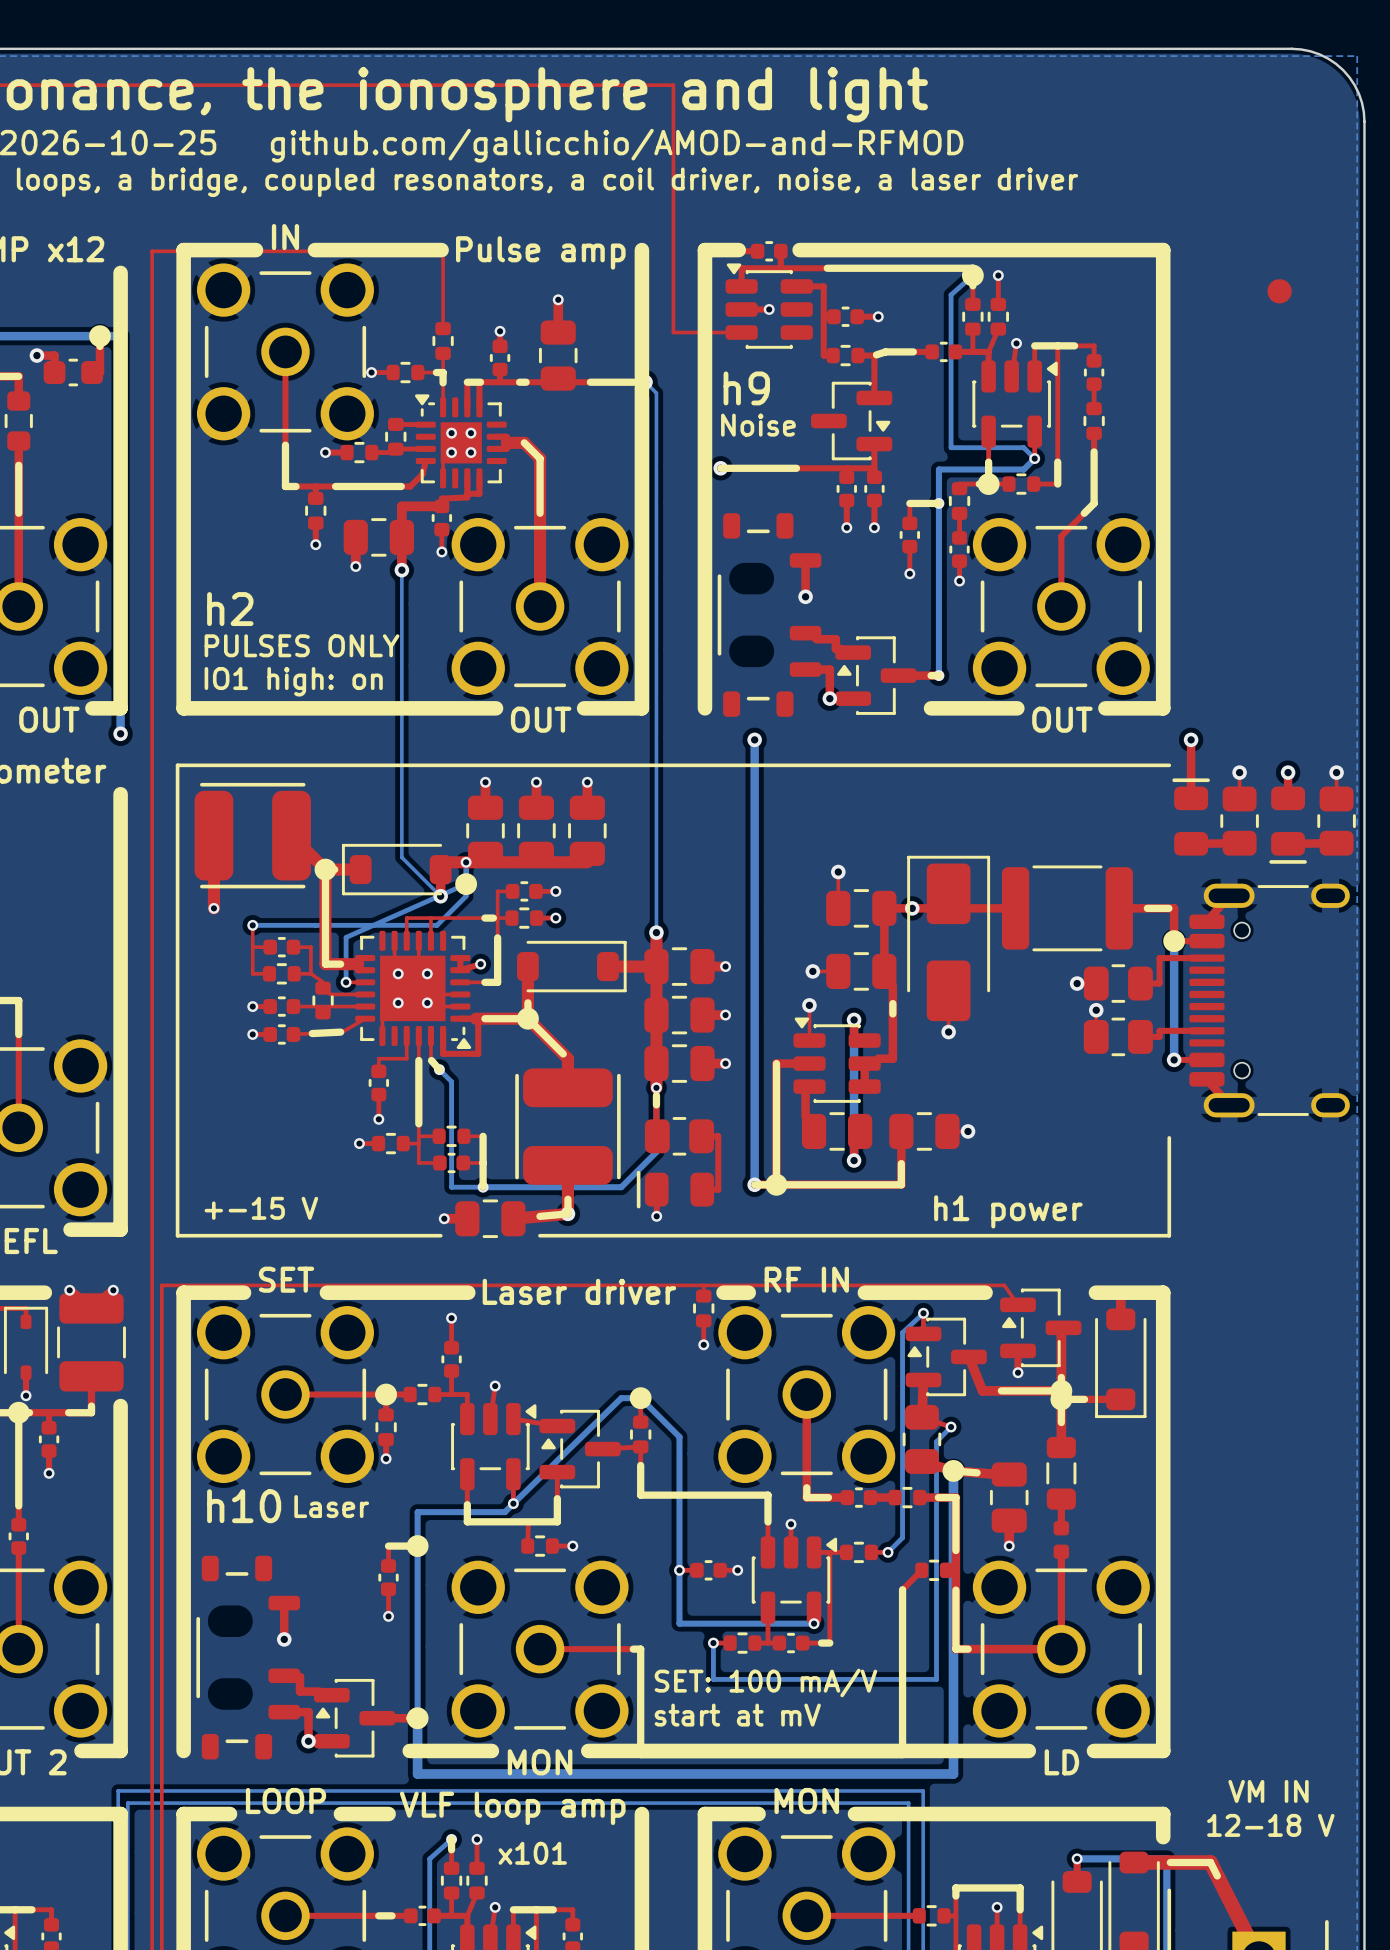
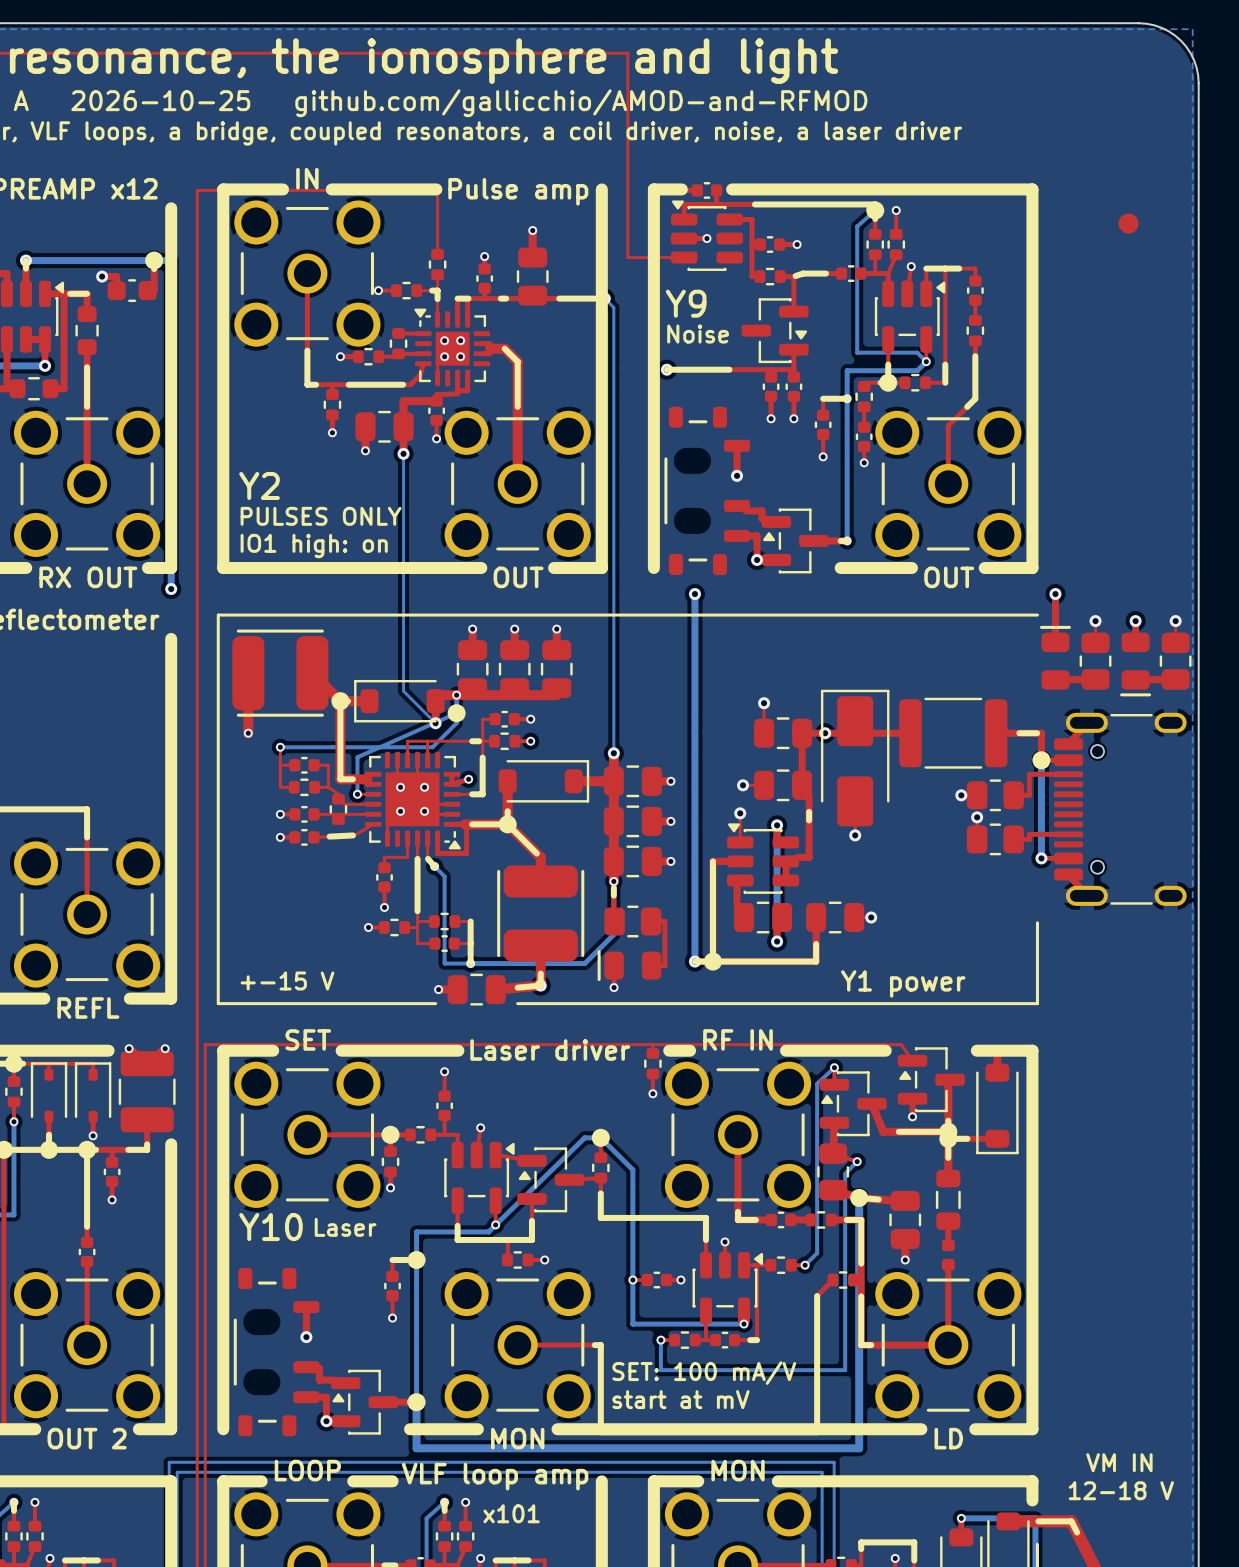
text: h9 (746, 388) -> Y9 (686, 303)
text: h2 (230, 609) -> Y2 (259, 485)
text: h1 power (1008, 1211) -> Y1 power (903, 983)
text: h10 (244, 1506) -> Y10 (270, 1227)

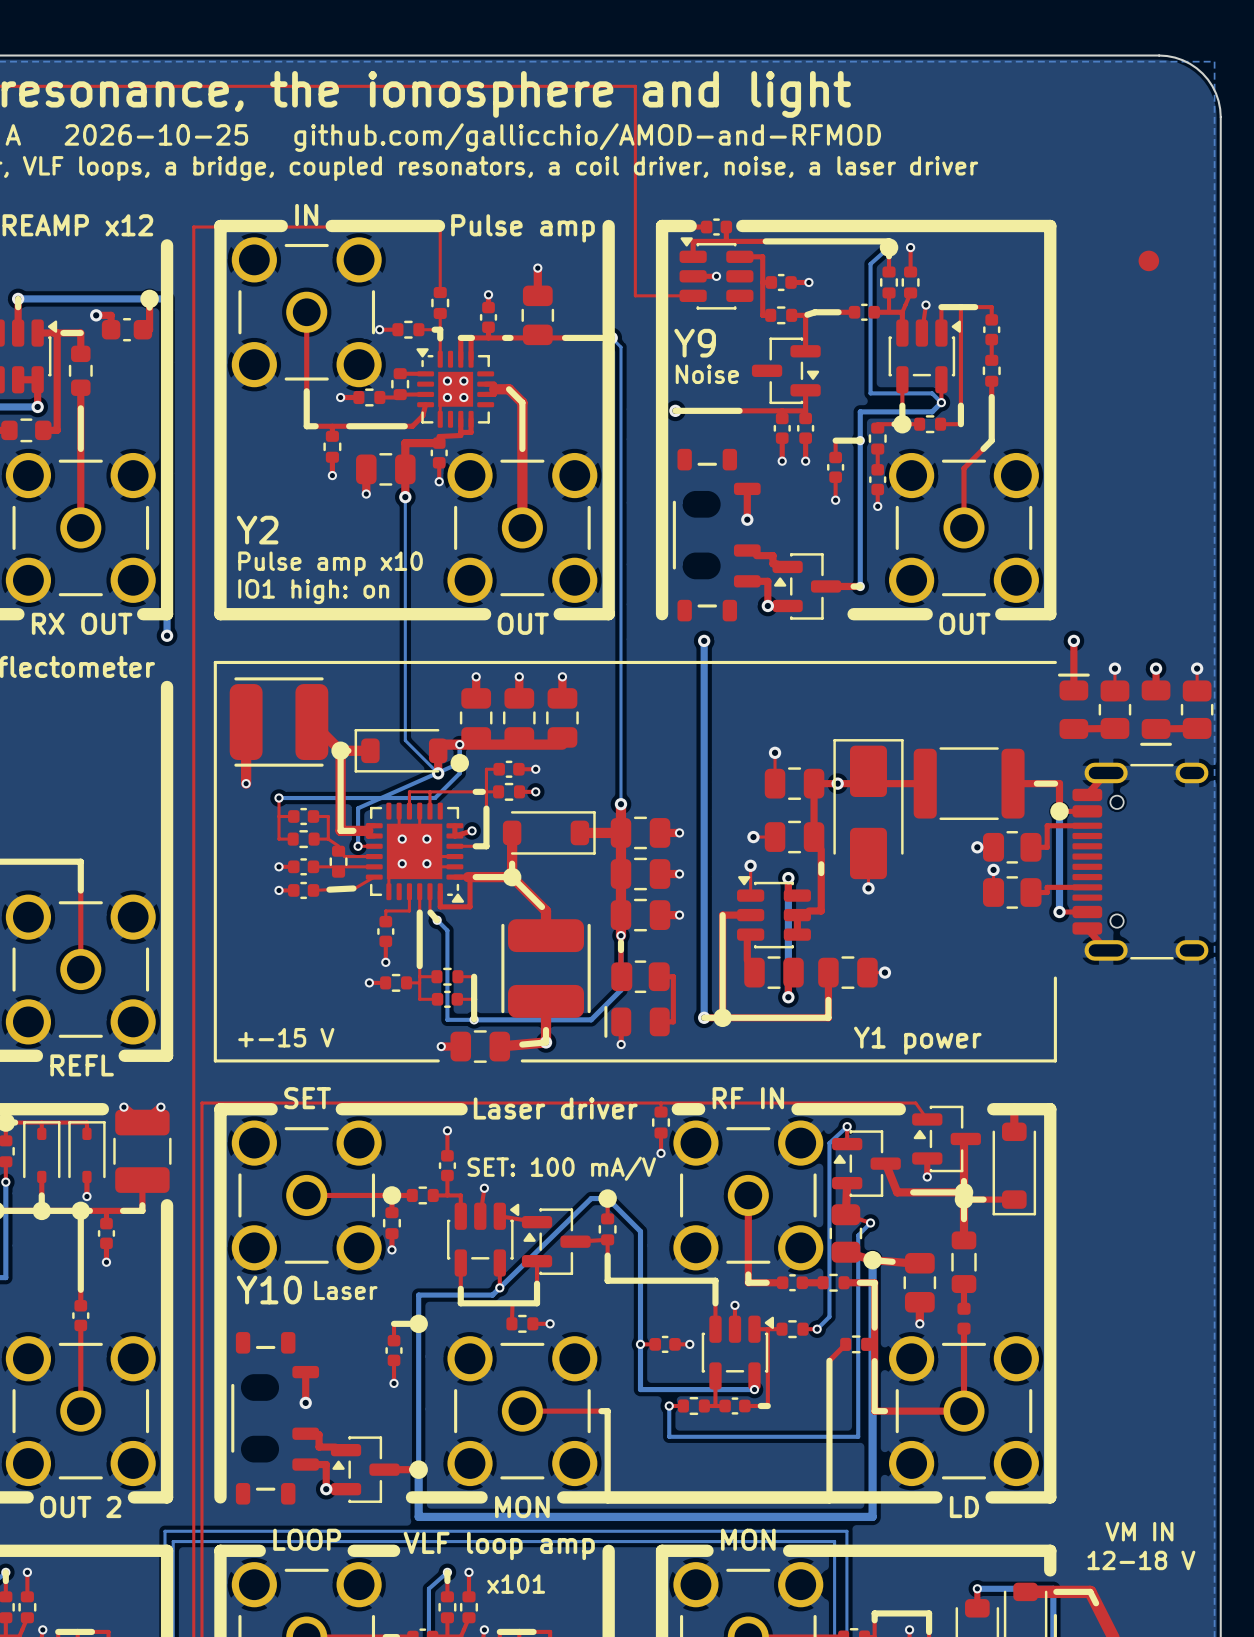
text: PULSES ONLY (321, 516) -> Pulse amp x10 (330, 563)
text position: SET: 100 mA/V (704, 1373) -> SET: 100 mA/V (561, 1168)
text: start at mV (681, 1399) -> none

